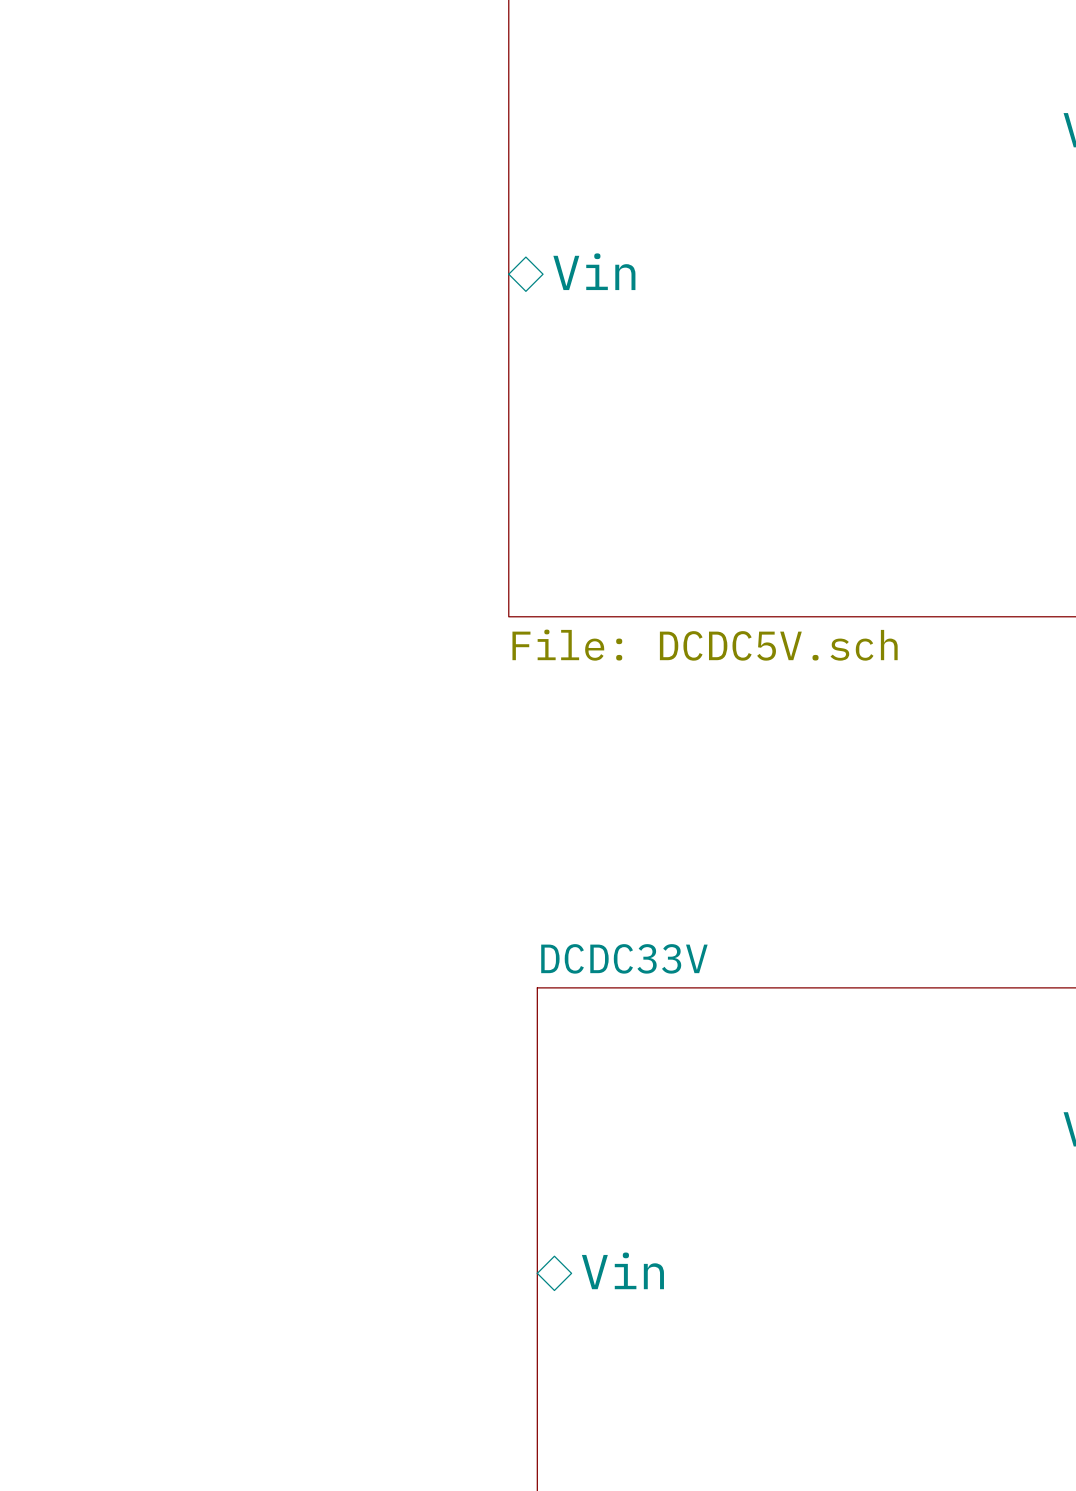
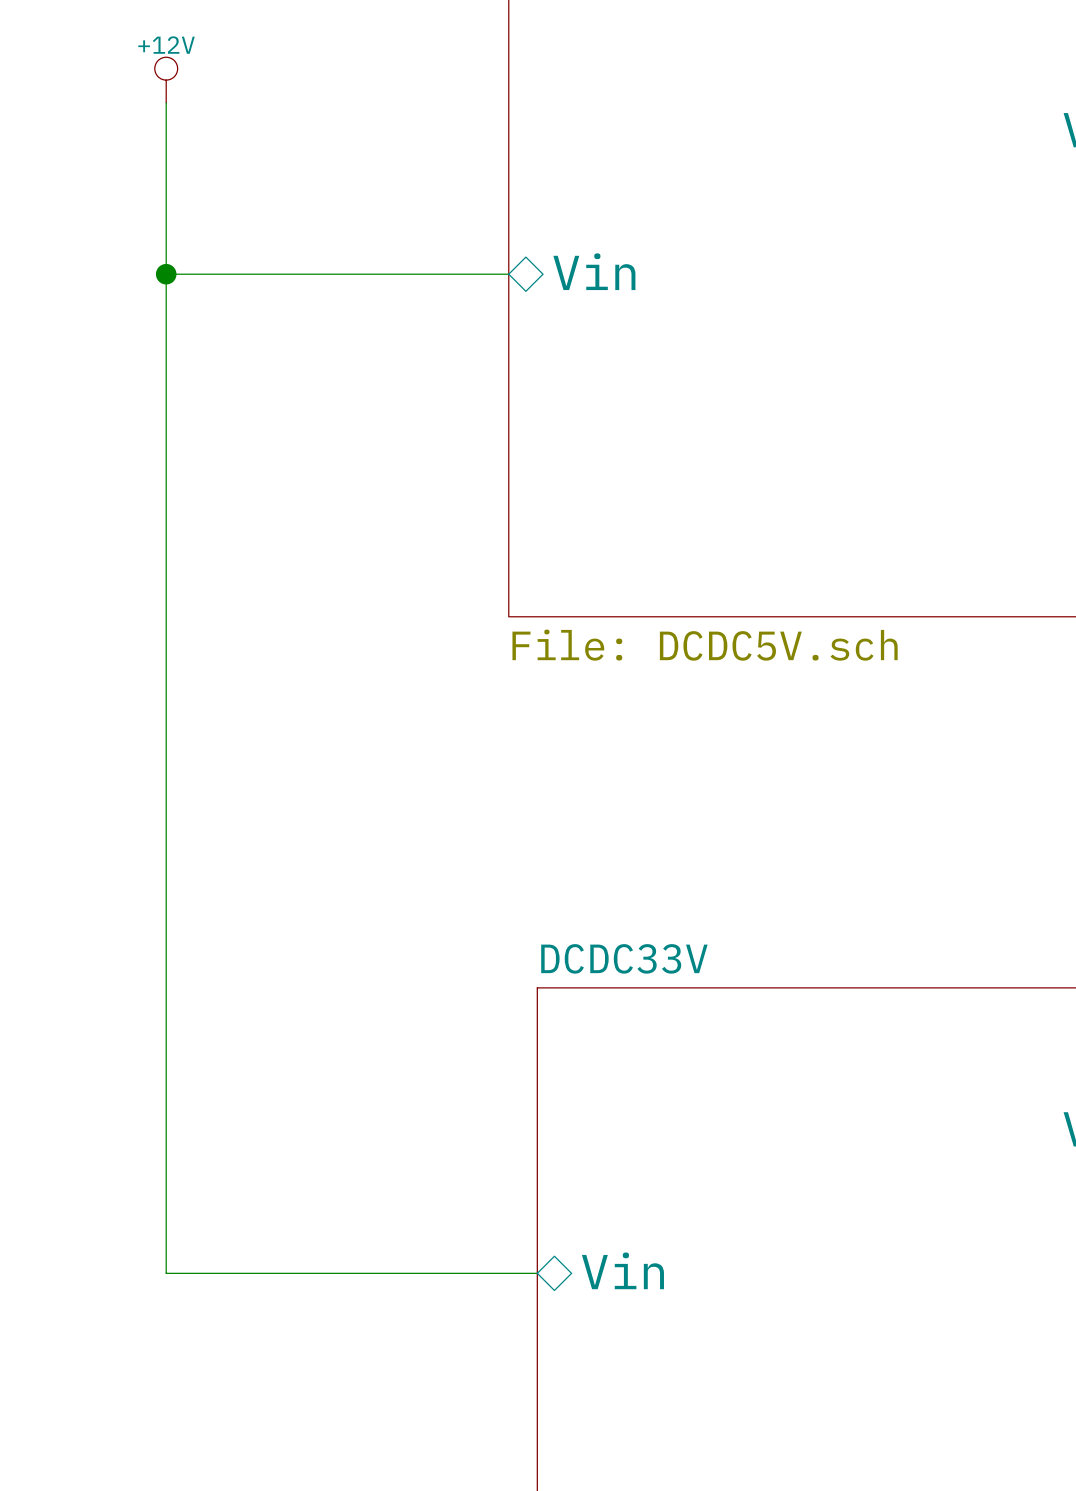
power symbol: none -> +12V (166, 80)
wire: none -> (166, 102) (166, 1273) (537, 1273)
wire: none -> (166, 274) (508, 274)
junction: none -> (166, 274)

